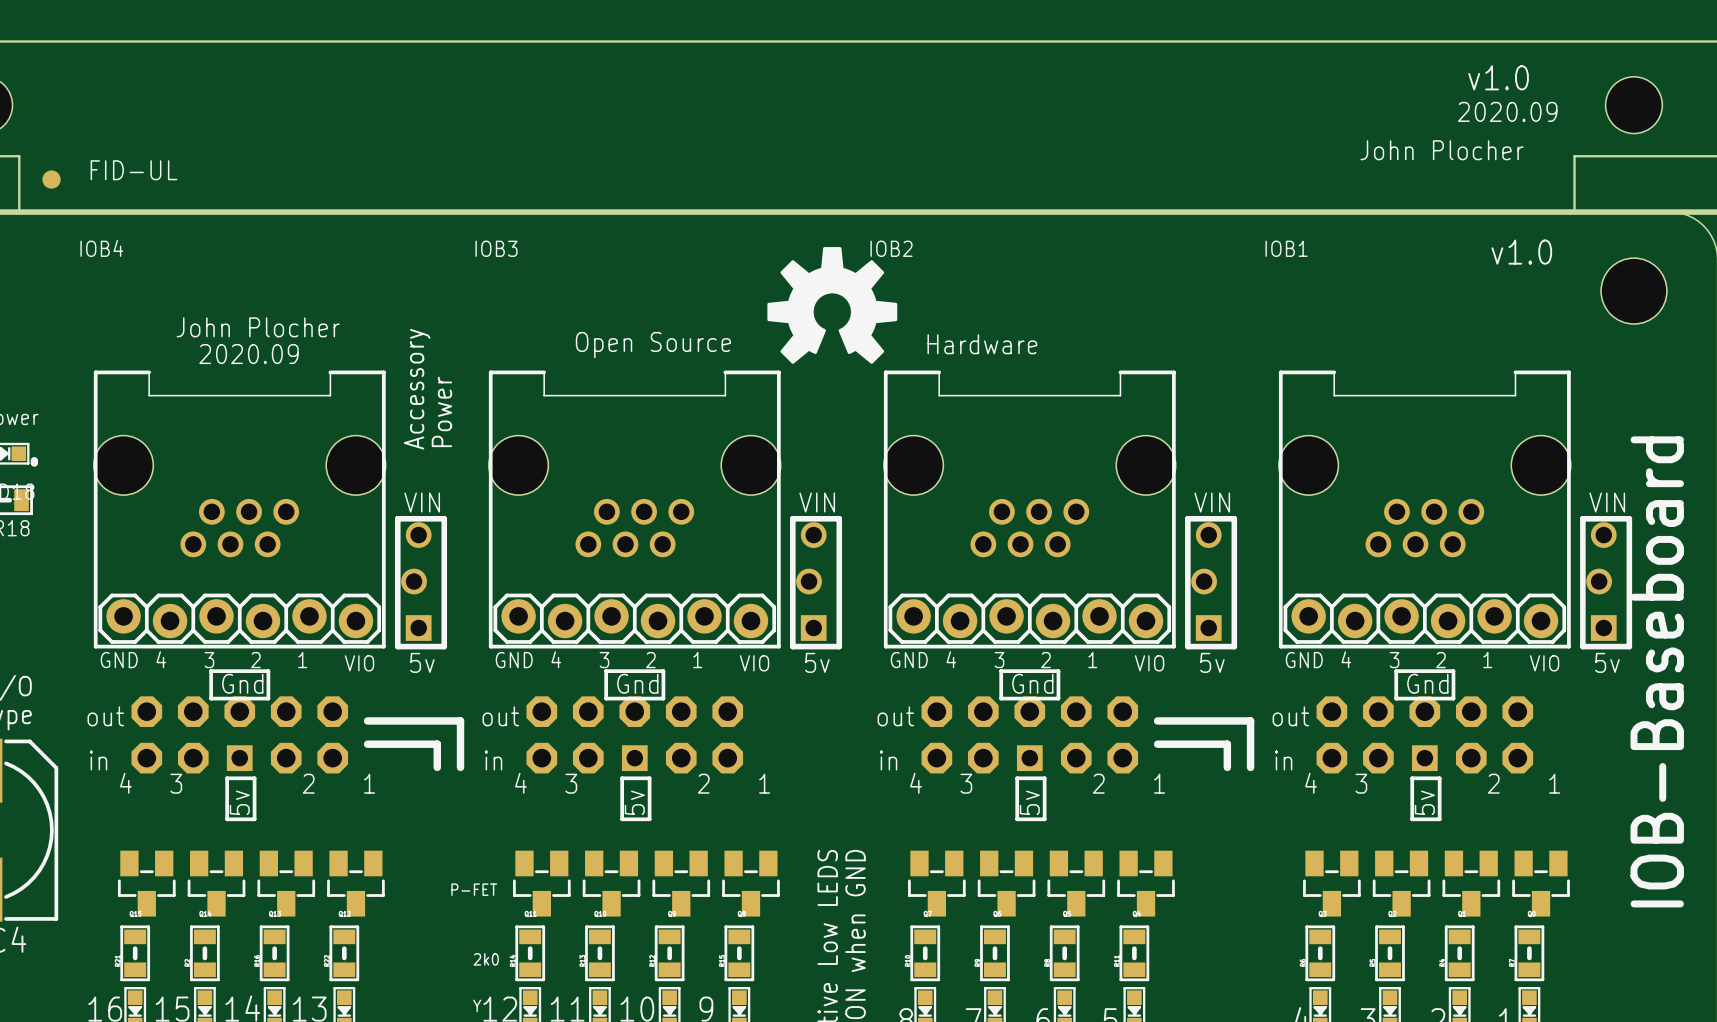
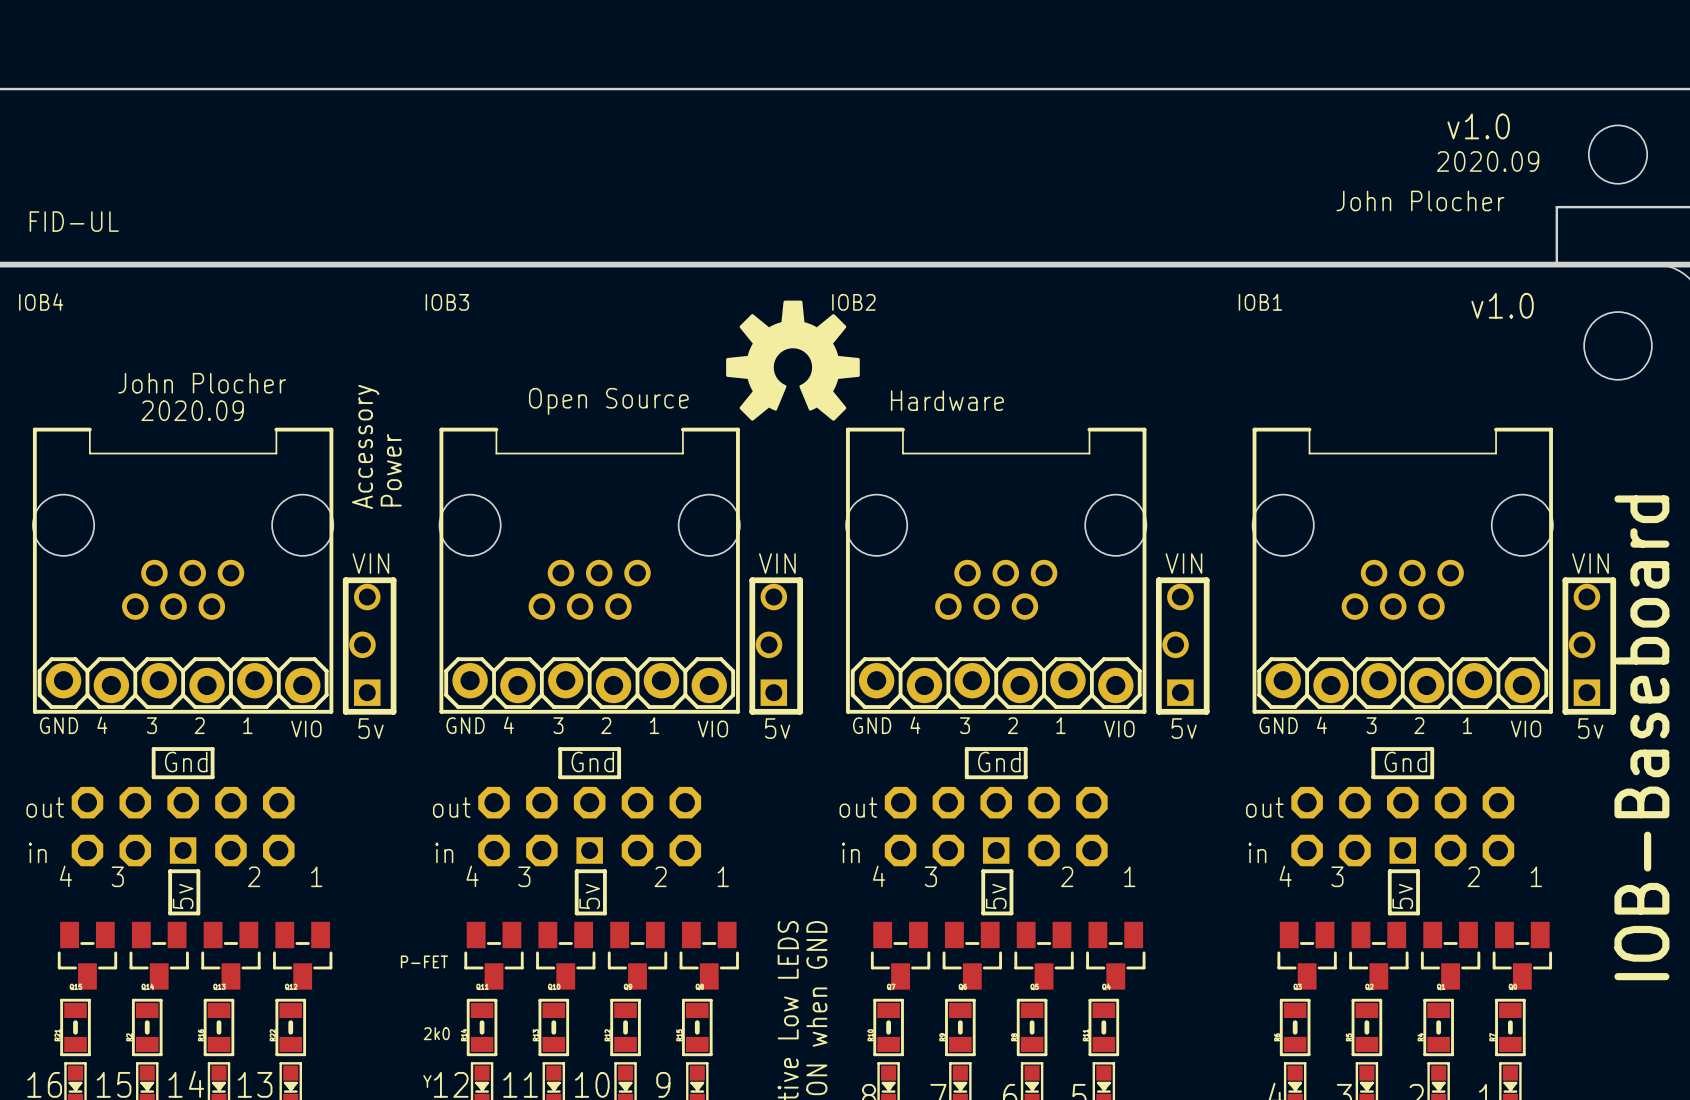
IOB4 footprint: [93, 370, 448, 822] -> [32, 427, 397, 916]
IOB3 footprint: [488, 370, 843, 822] -> [439, 427, 803, 916]
IOB2 footprint: [883, 370, 1238, 822] -> [846, 427, 1210, 916]
IOB1 footprint: [1278, 370, 1633, 822] -> [1252, 427, 1617, 916]
line: (367, 720) (460, 720) (460, 767) -> none
line: (1157, 720) (1250, 720) (1250, 767) -> none
line: (367, 744) (437, 744) (437, 767) -> none
line: (1157, 744) (1227, 744) (1227, 767) -> none

